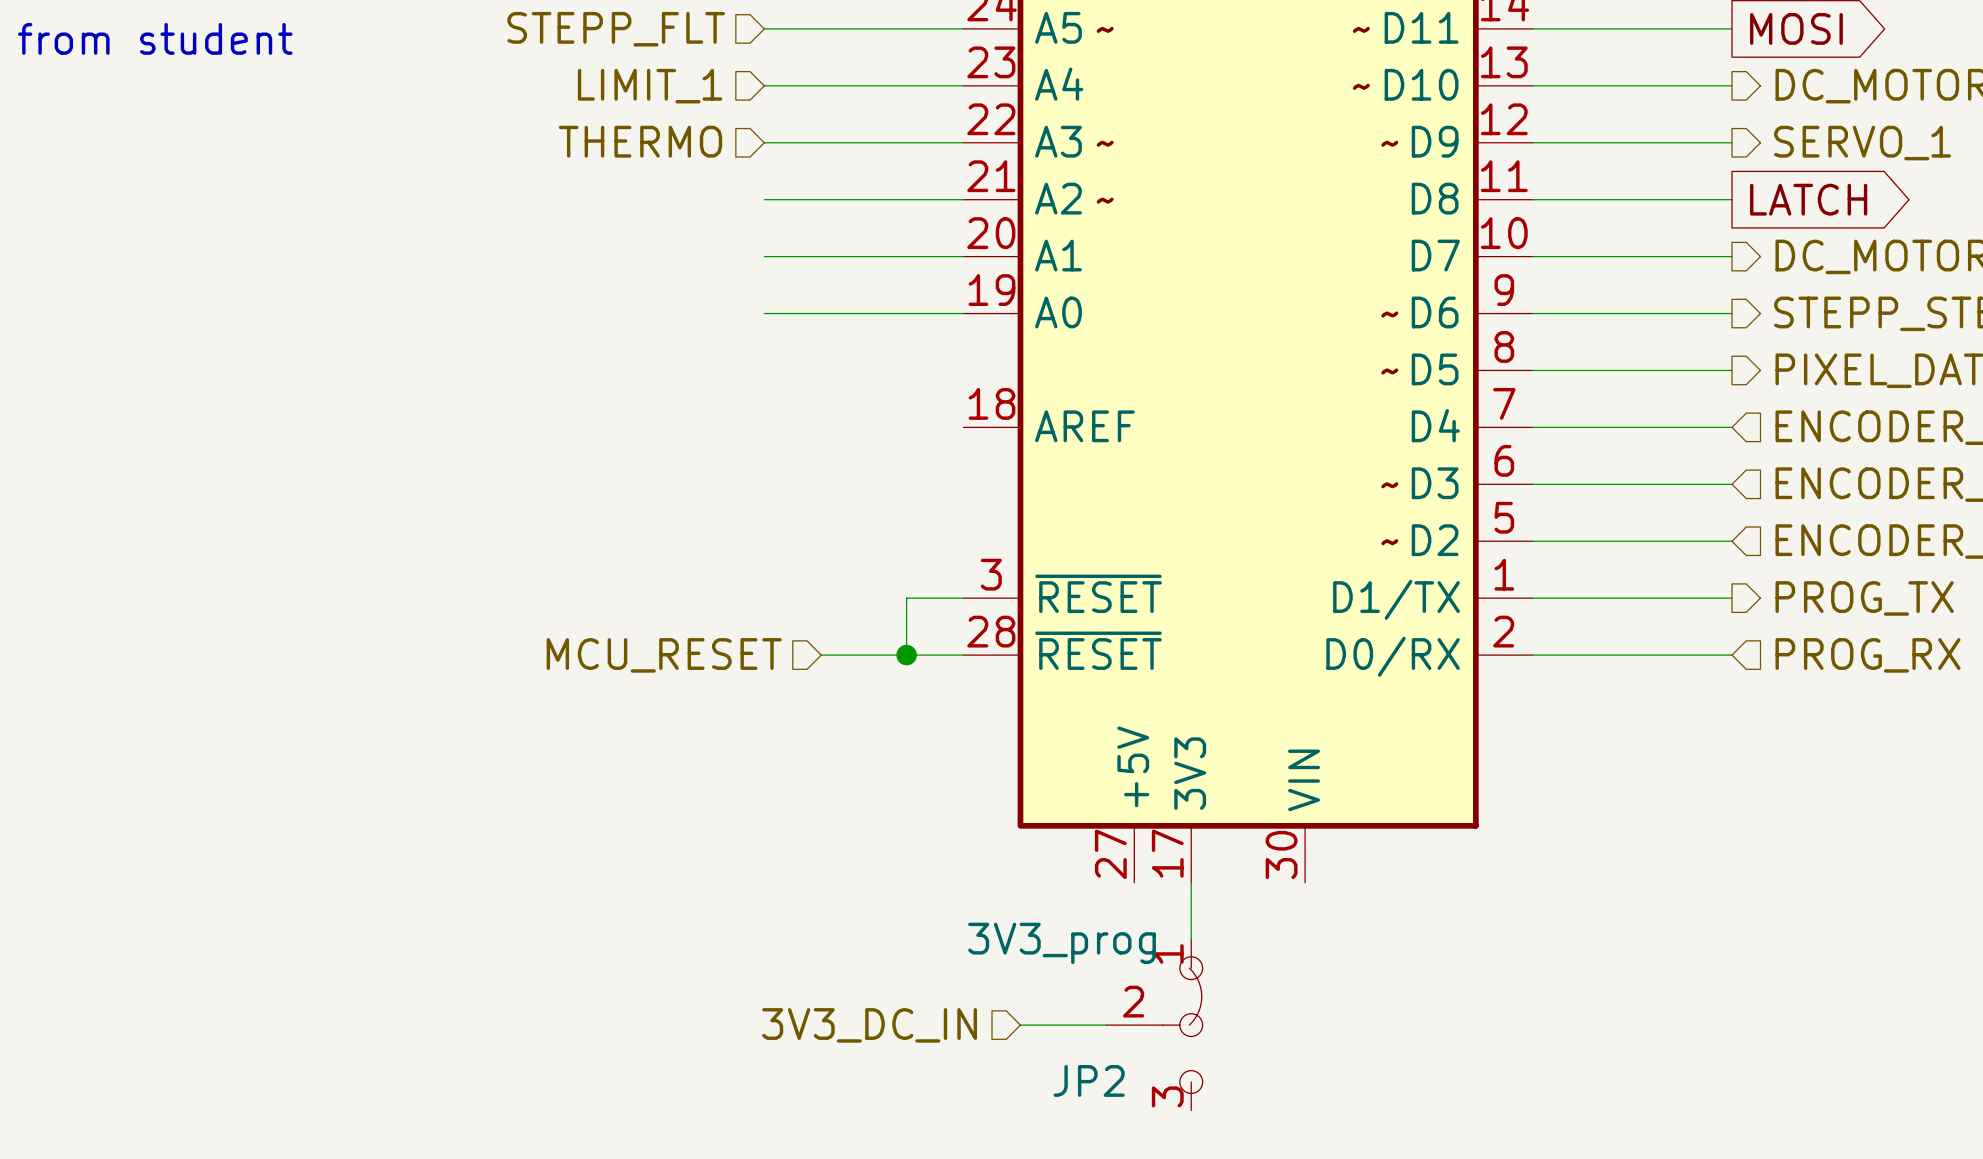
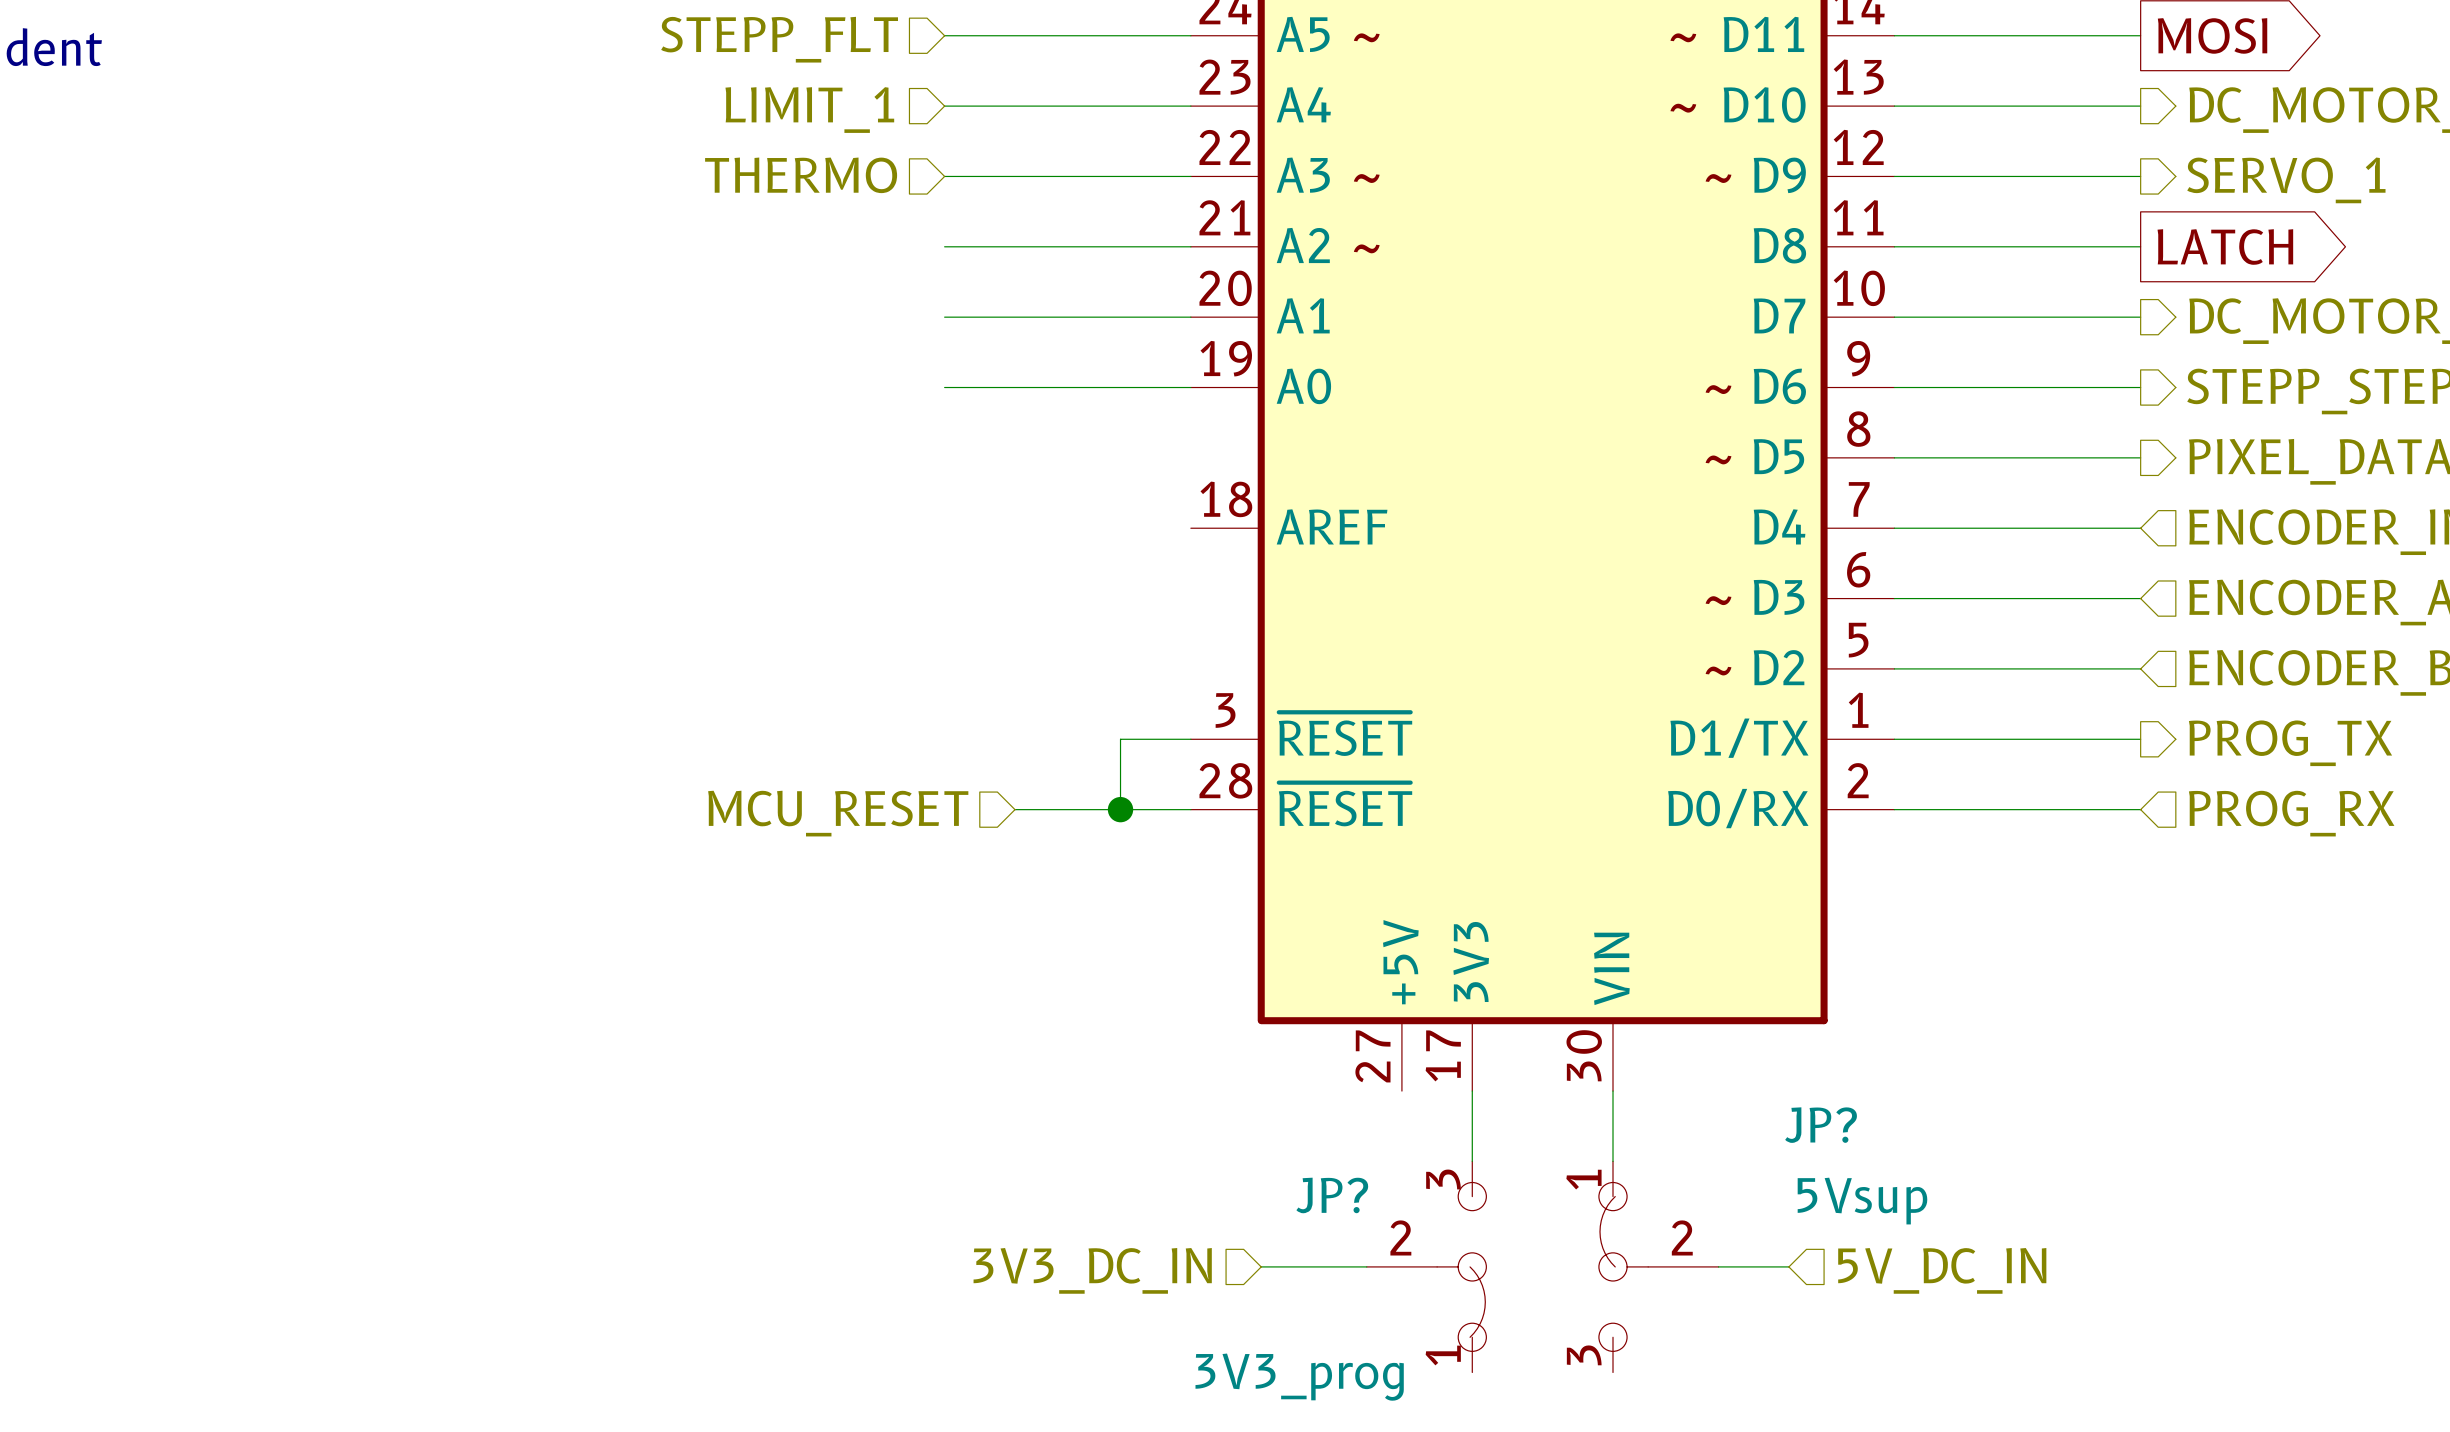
wire: none -> (1613, 1091) (1613, 1161)
JP2: 3V3_prog (1154, 1025) -> none
JP?: none -> 3V3_prog (1426, 1266)
JP?: none -> 5Vsup (1658, 1266)
wire: none -> (1718, 1266) (1788, 1266)
hierarchical label: none -> 5V_DC_IN (1942, 1270)

